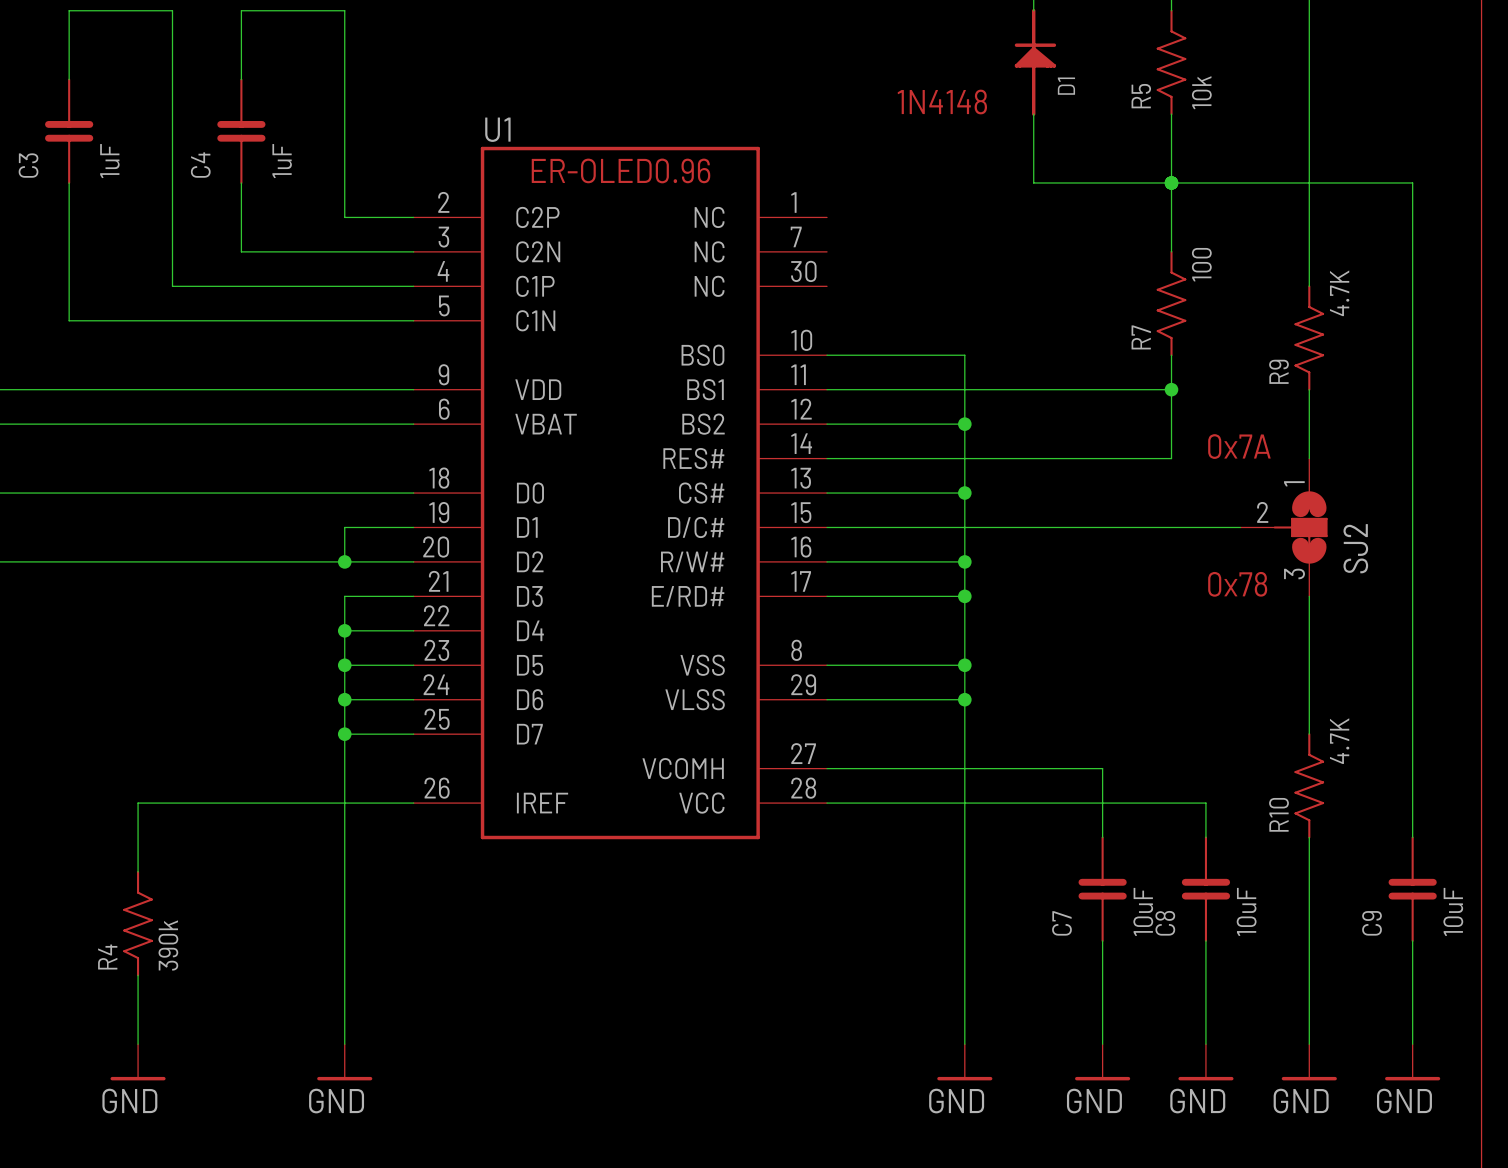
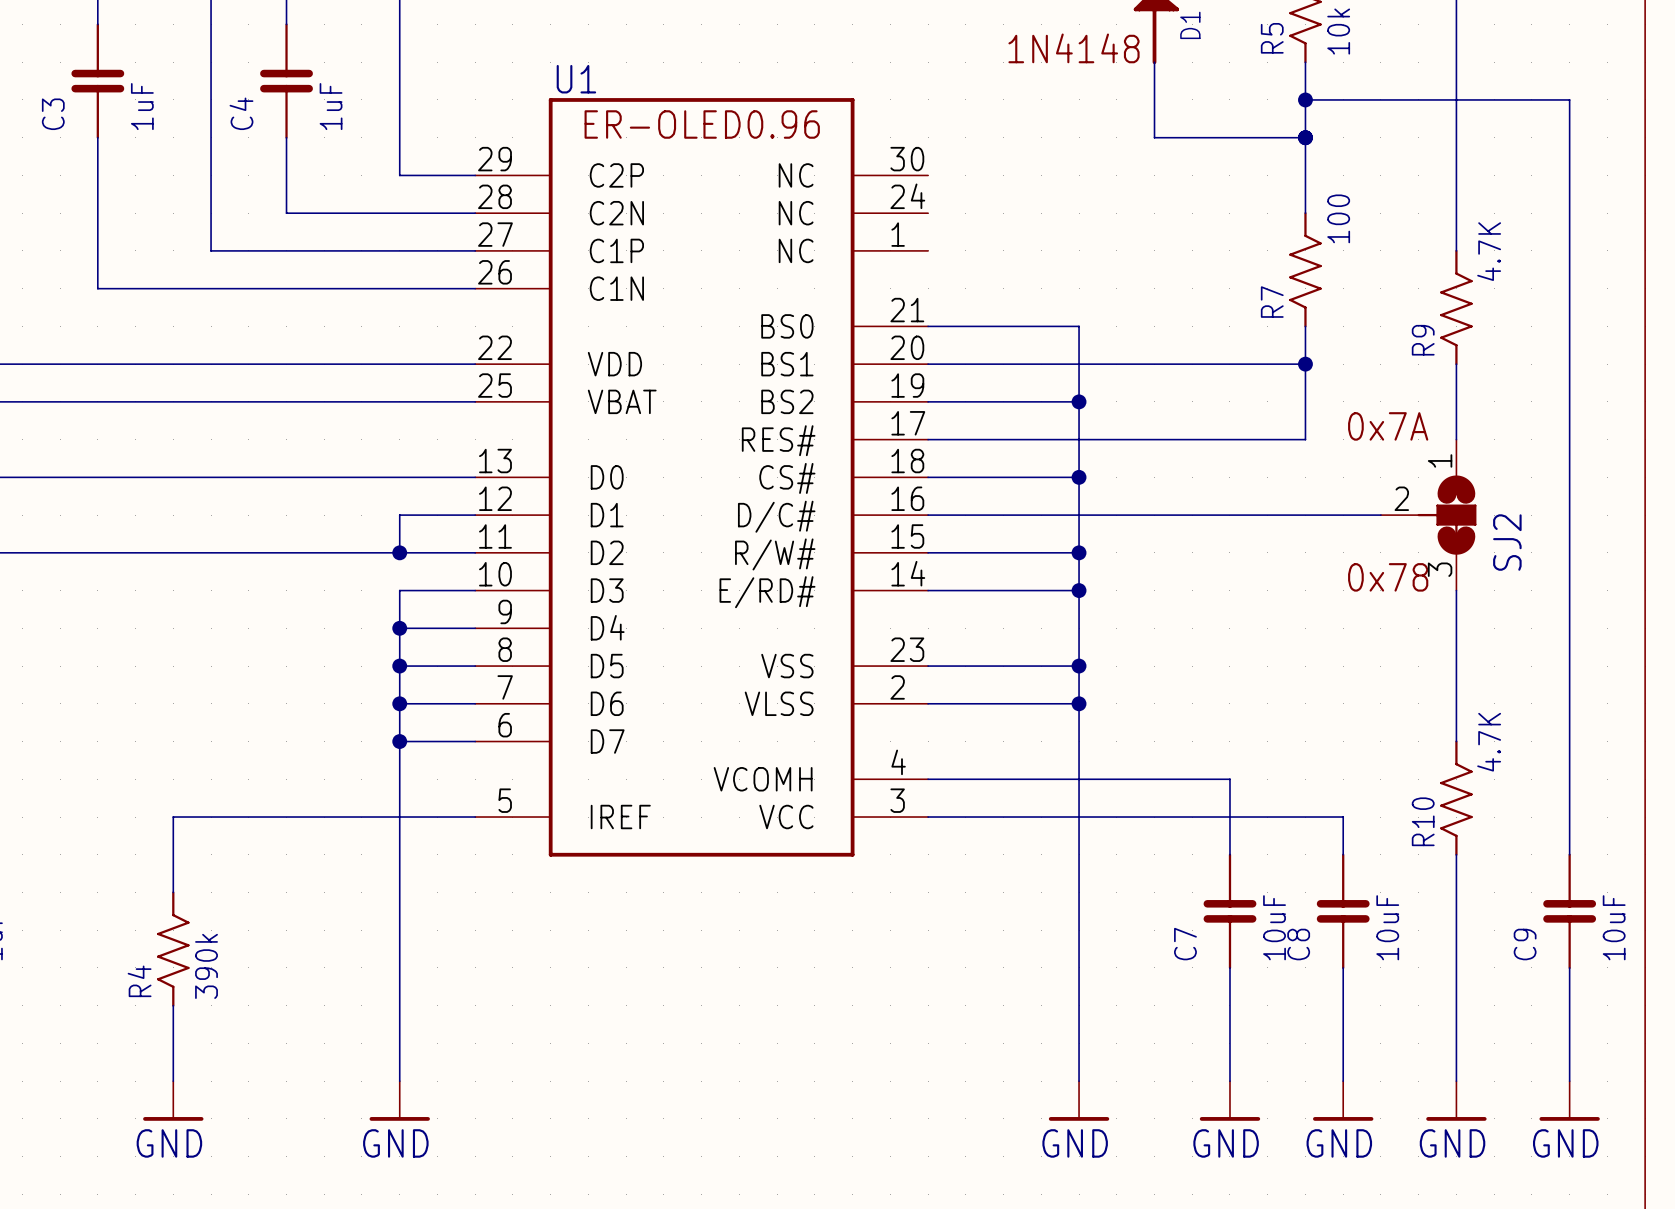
U1 symbol: [413, 146, 828, 840] -> [475, 98, 929, 857]
junction: none -> (1305, 99)
wire: (1171, 182) (1412, 182) -> (1305, 99) (1569, 99) (1569, 137)

